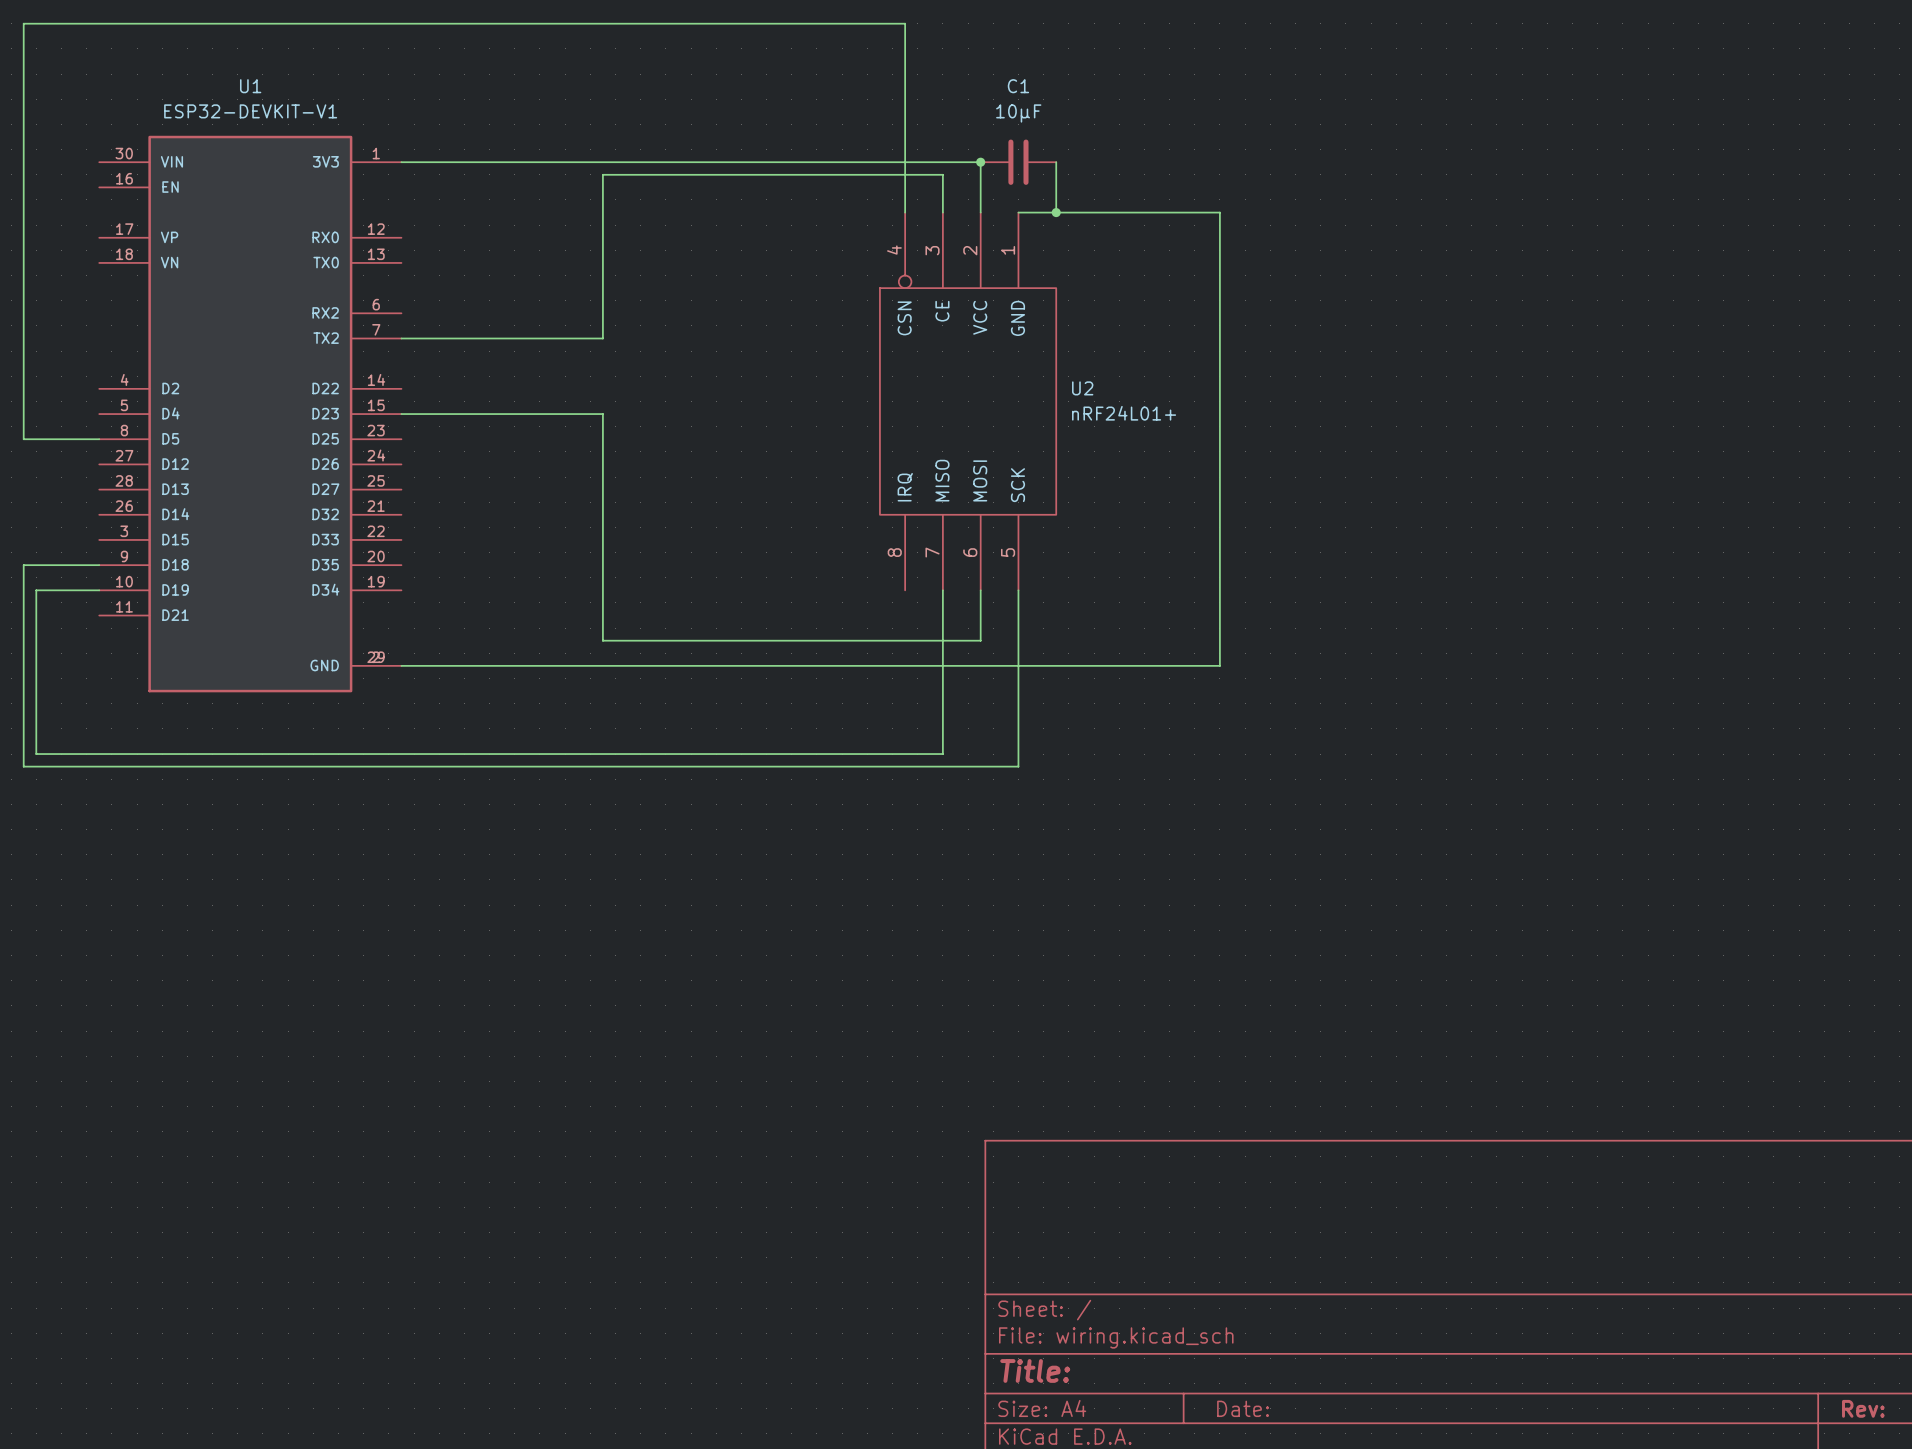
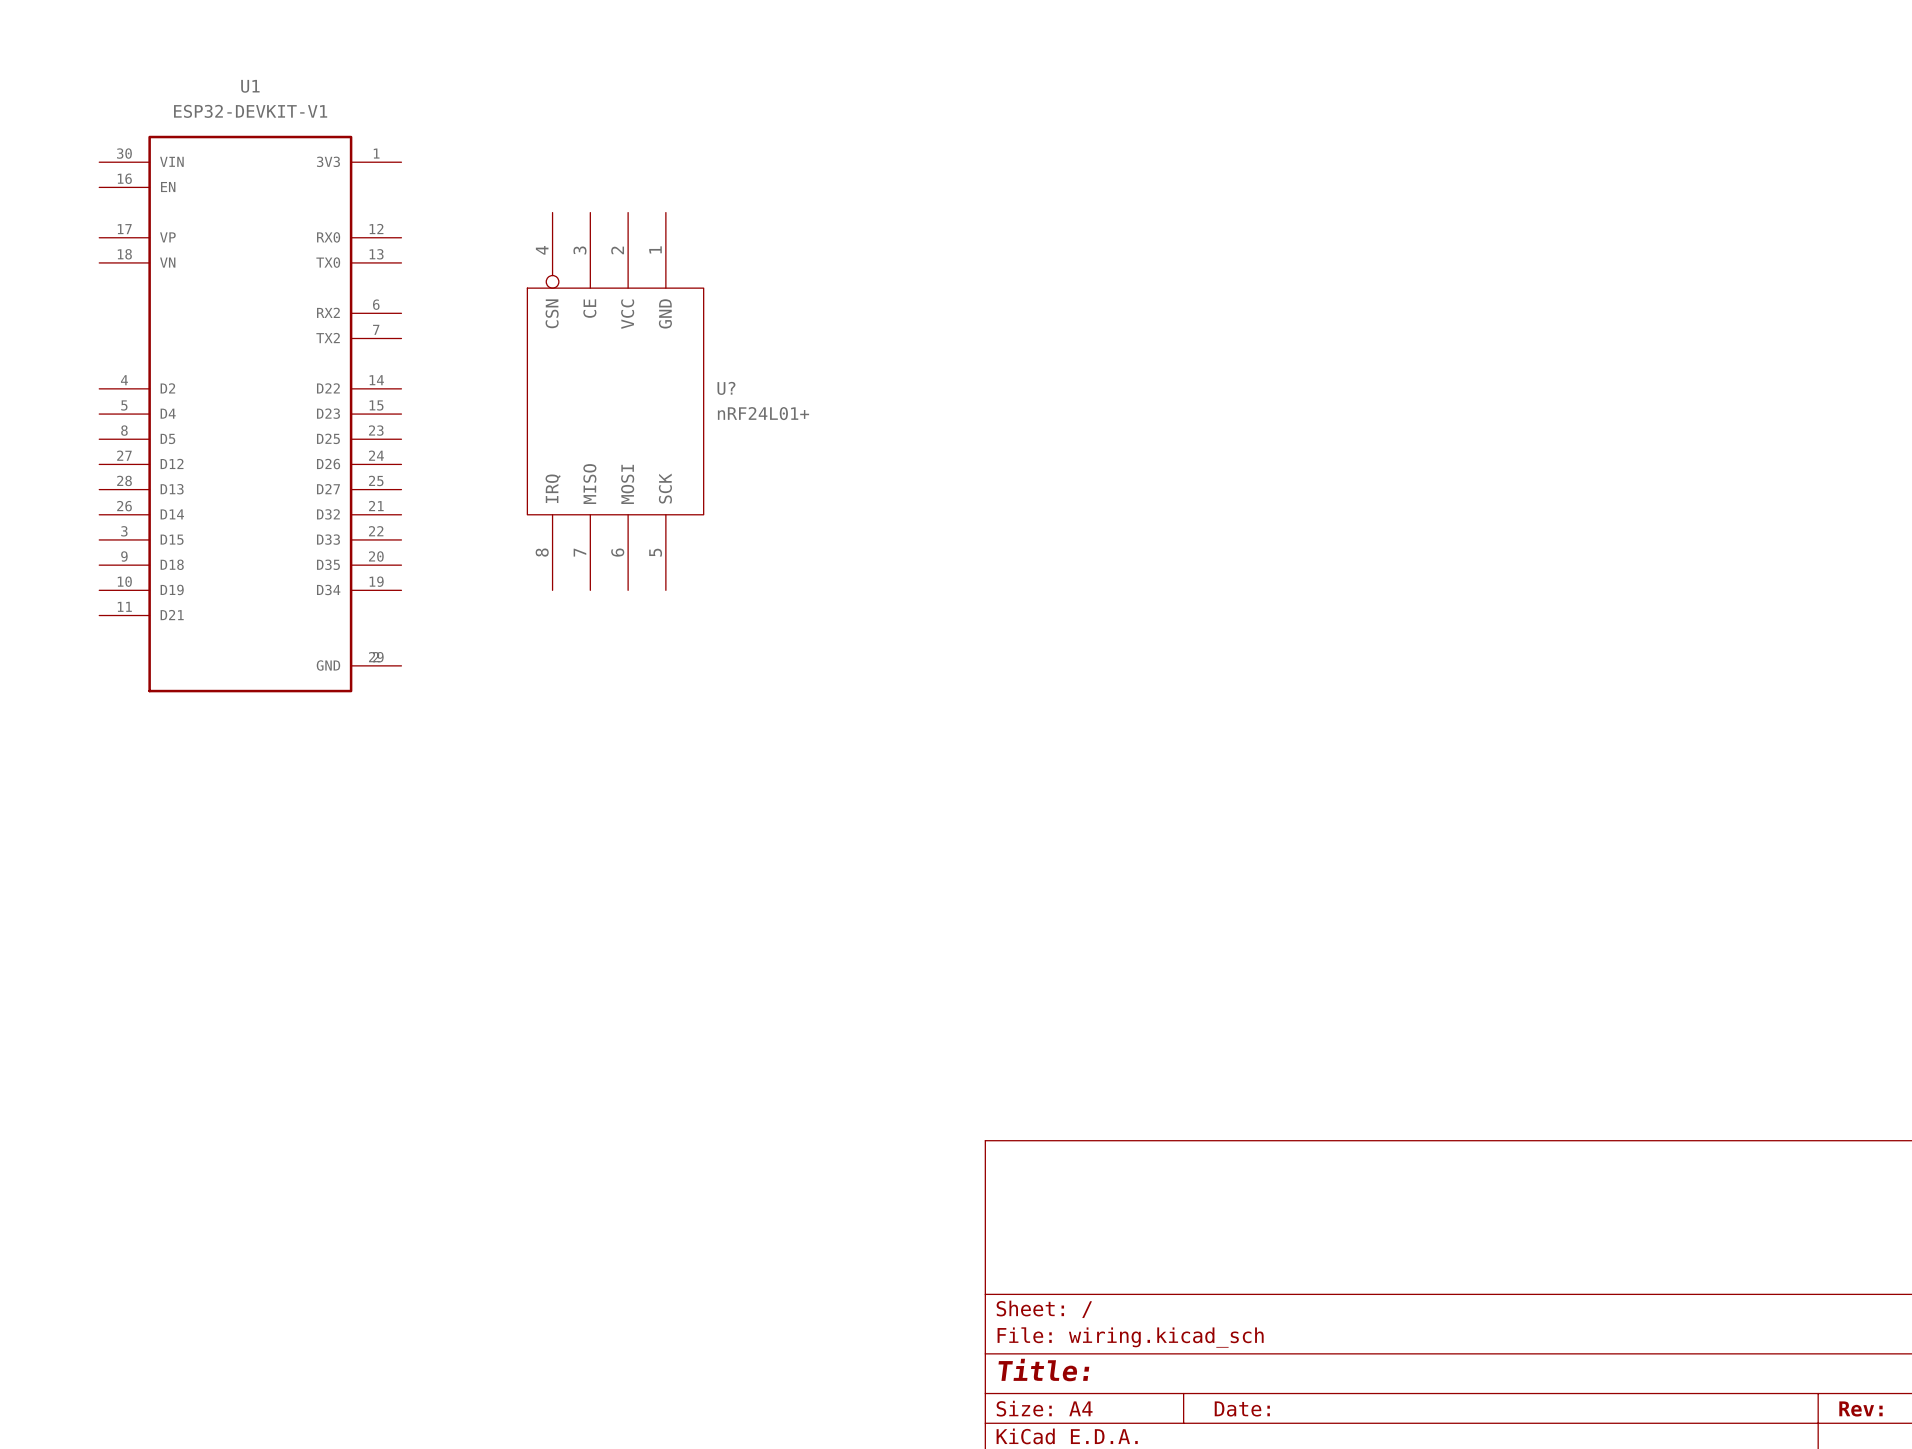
wire: (401, 162) (980, 162) (980, 212) -> none
junction: (980, 162) -> none
C1: 10µF (1018, 162) -> none
wire: (1056, 162) (1056, 212) -> none
wire: (905, 212) (905, 23) (23, 23) (23, 439) (99, 439) -> none
wire: (942, 212) (942, 174) (602, 174) (602, 338) (401, 338) -> none
wire: (1018, 212) (1219, 212) (1219, 665) (401, 665) -> none
junction: (1056, 212) -> none
U?: none -> nRF24L01+ (615, 401)
U2: nRF24L01+ (968, 401) -> none
wire: (401, 414) (602, 414) (602, 640) (980, 640) (980, 590) -> none
wire: (99, 565) (23, 565) (23, 766) (1018, 766) (1018, 590) -> none
wire: (99, 590) (36, 590) (36, 754) (942, 754) (942, 590) -> none

